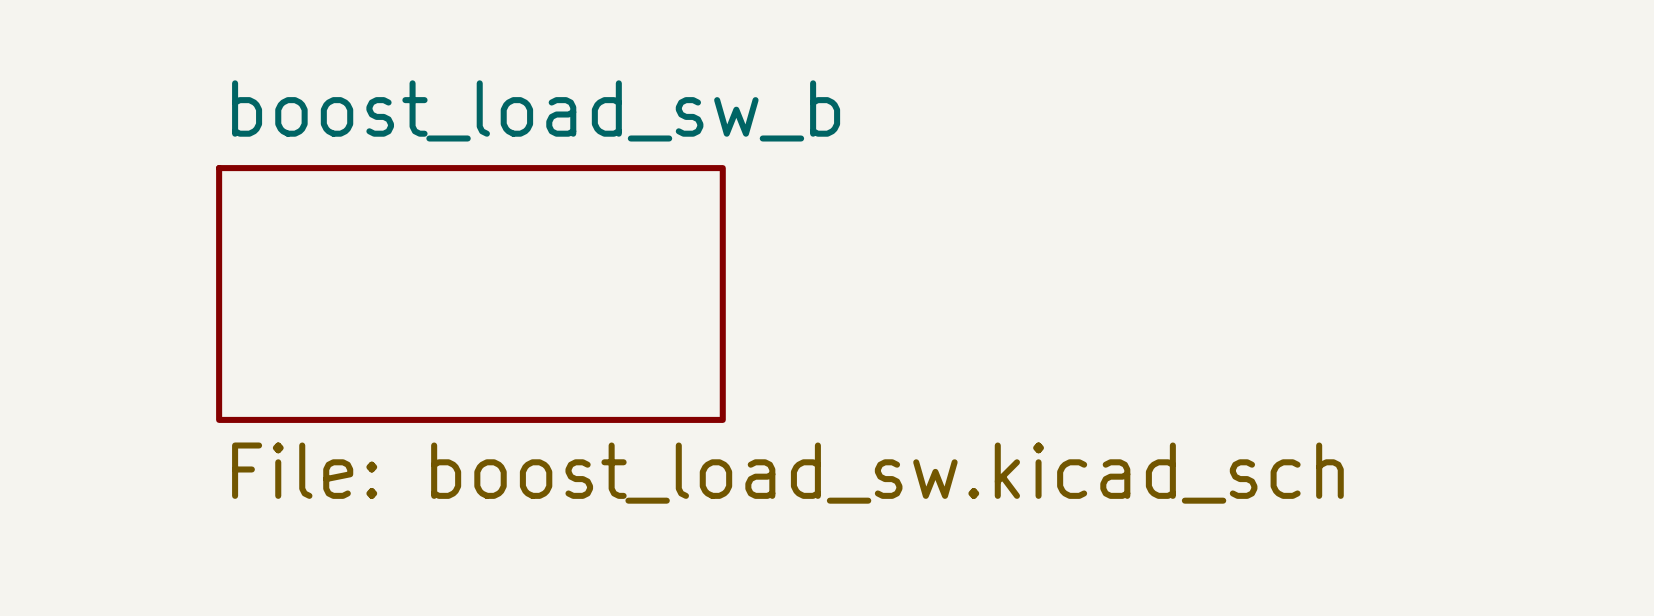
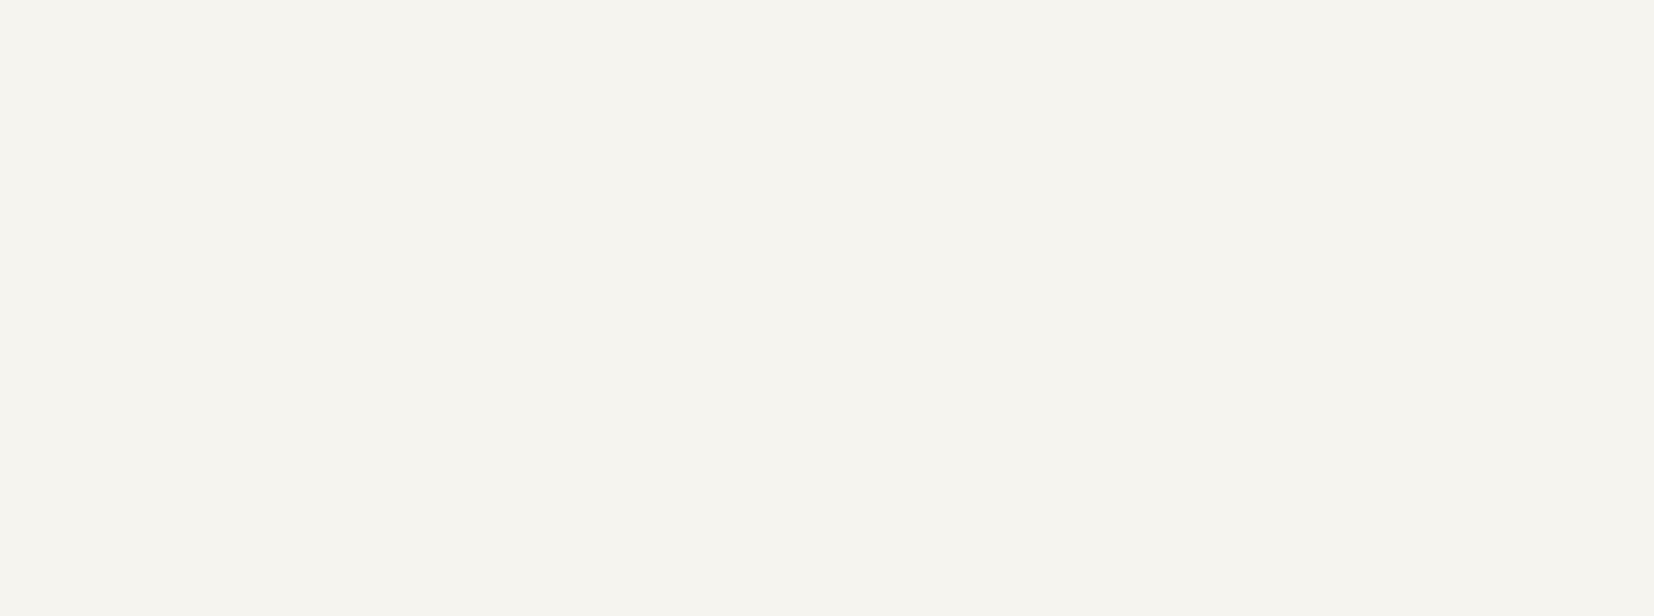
sheet boost_load_sw_b: File: boost_load_sw.kicad_sch (470, 294) -> none

